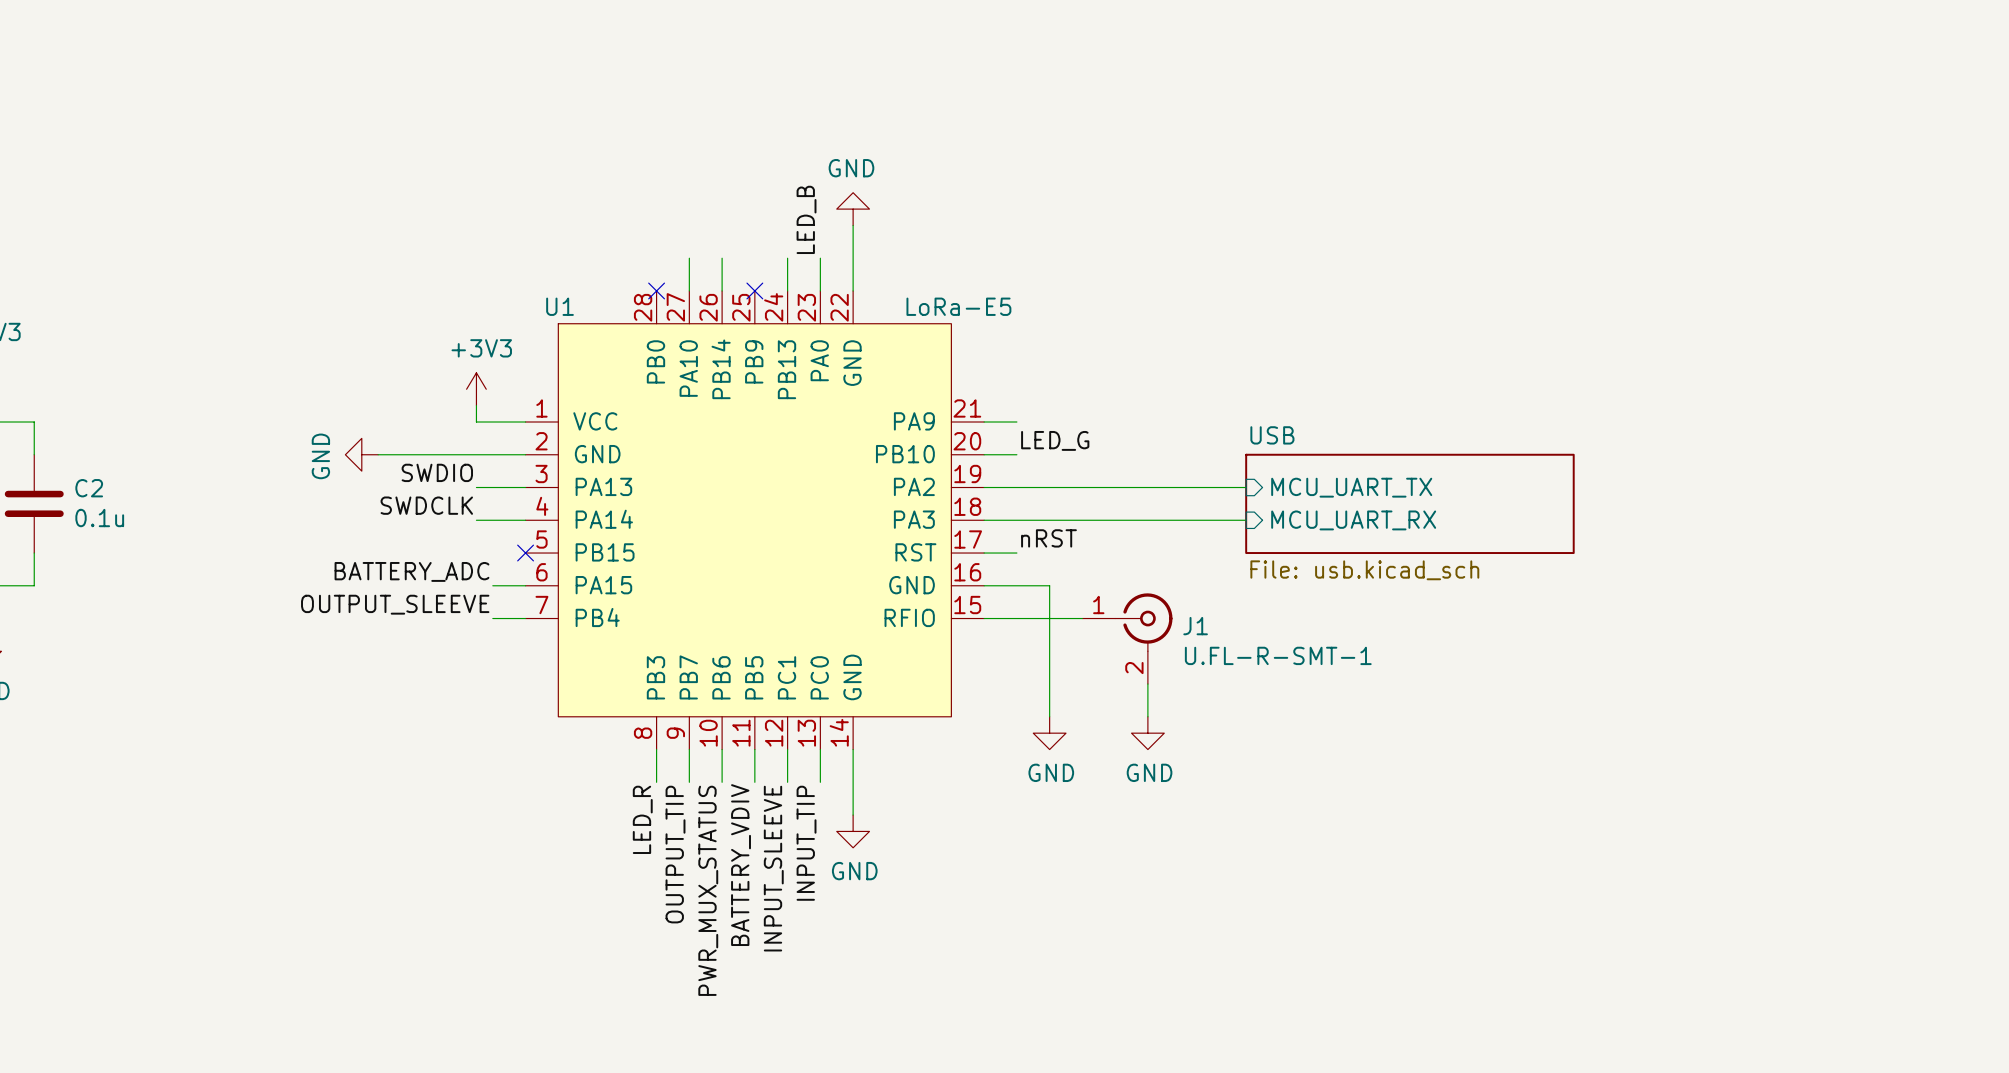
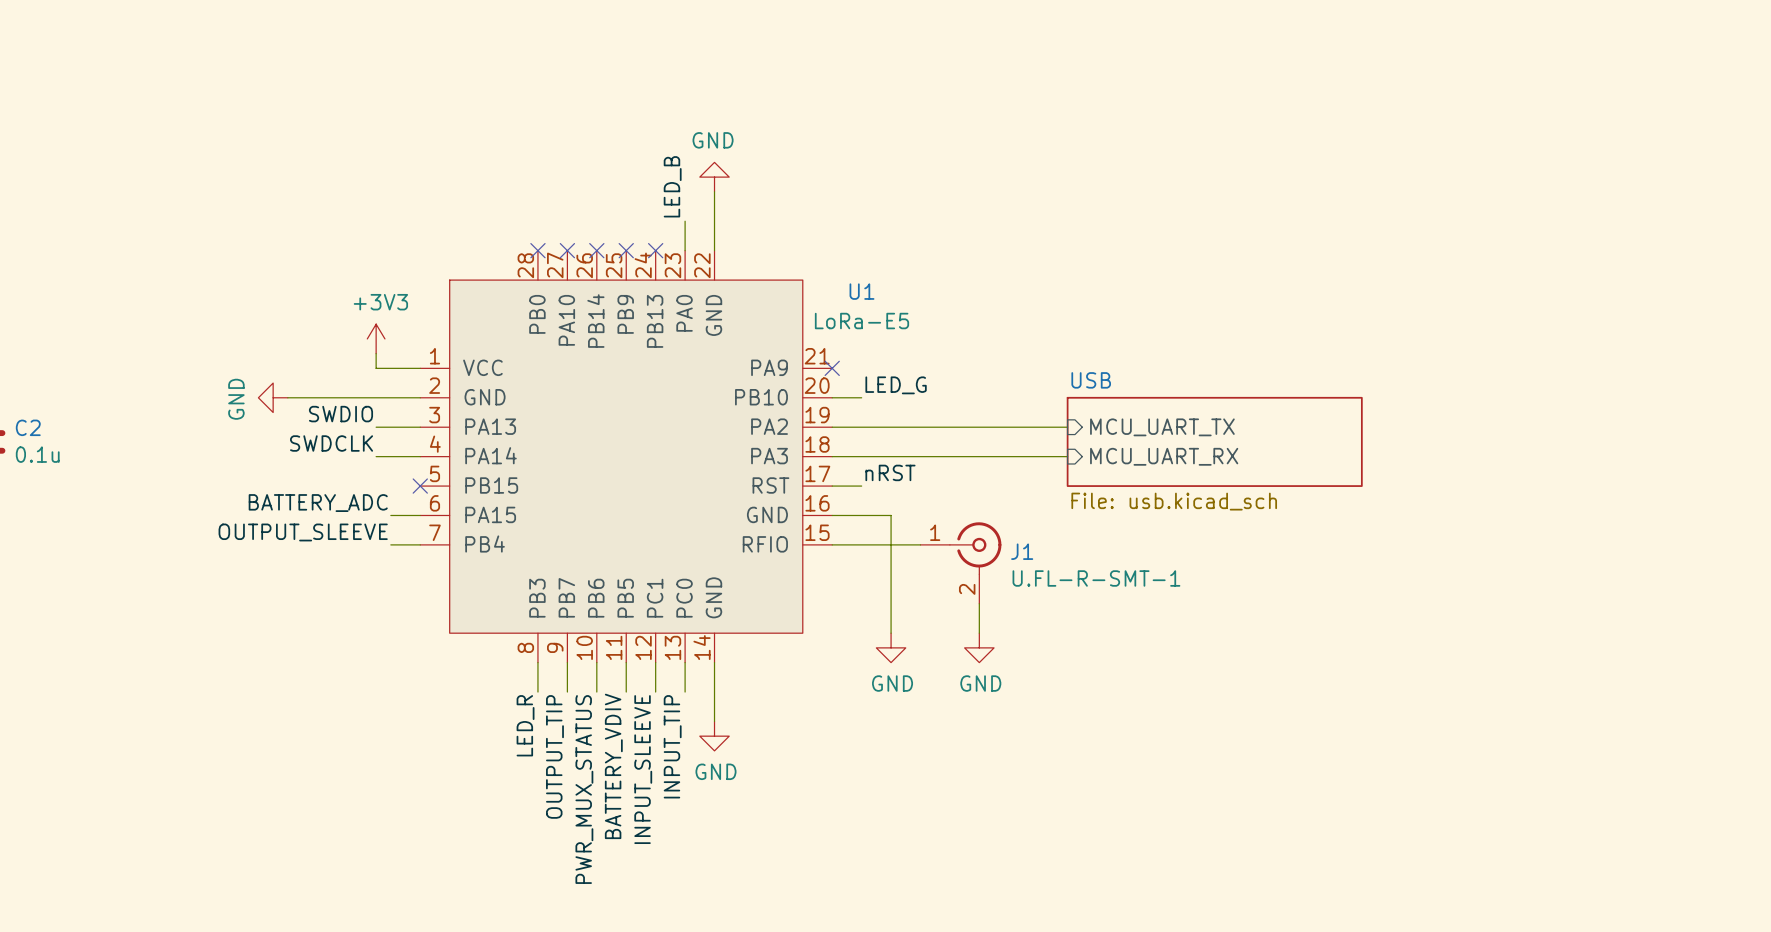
wire: (689, 258) (689, 290) -> none
wire: (722, 258) (722, 290) -> none
wire: (787, 258) (787, 290) -> none
no-connect mark: none -> (567, 250)
no-connect mark: none -> (596, 250)
no-connect mark: none -> (655, 250)
U1 name position: U1 (560, 306) -> U1 (861, 291)
U1 value position: LoRa-E5 (958, 306) -> LoRa-E5 (861, 321)
wire: (984, 422) (1016, 422) -> none
no-connect mark: none -> (832, 368)

